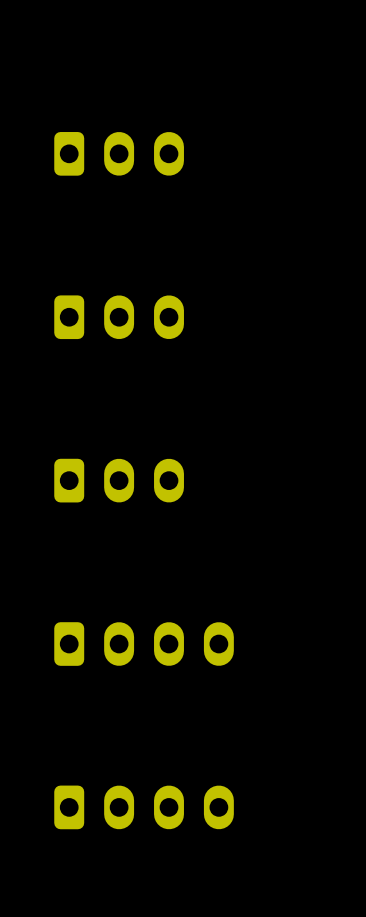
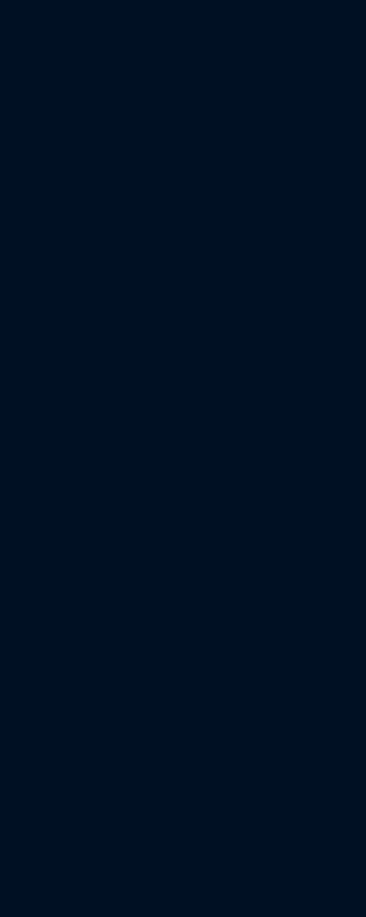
part: (119, 153) -> none
part: (119, 317) -> none
part: (119, 480) -> none
part: (144, 644) -> none
part: (144, 807) -> none

